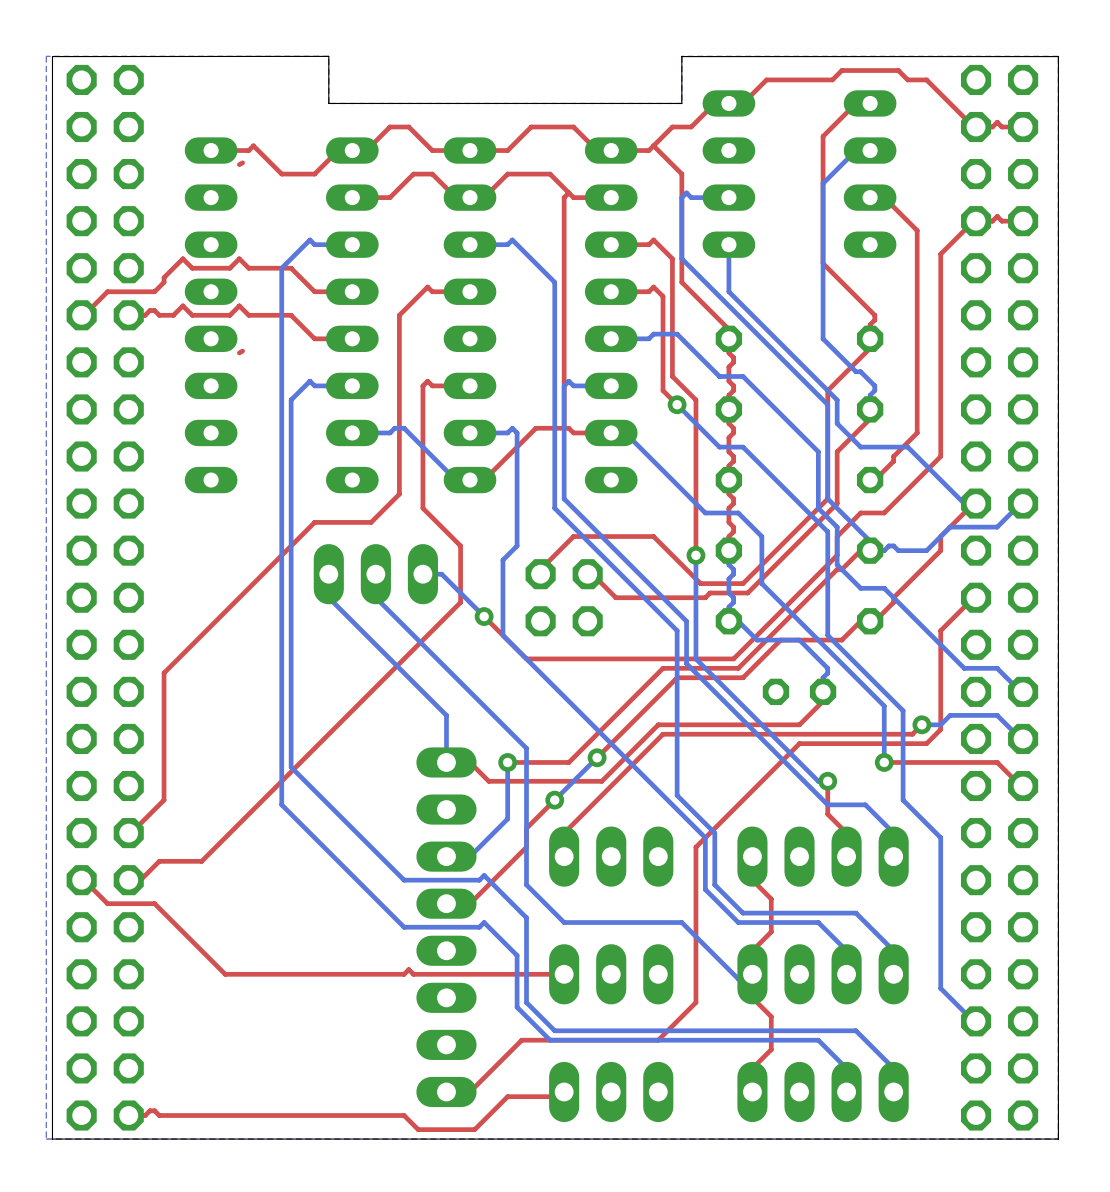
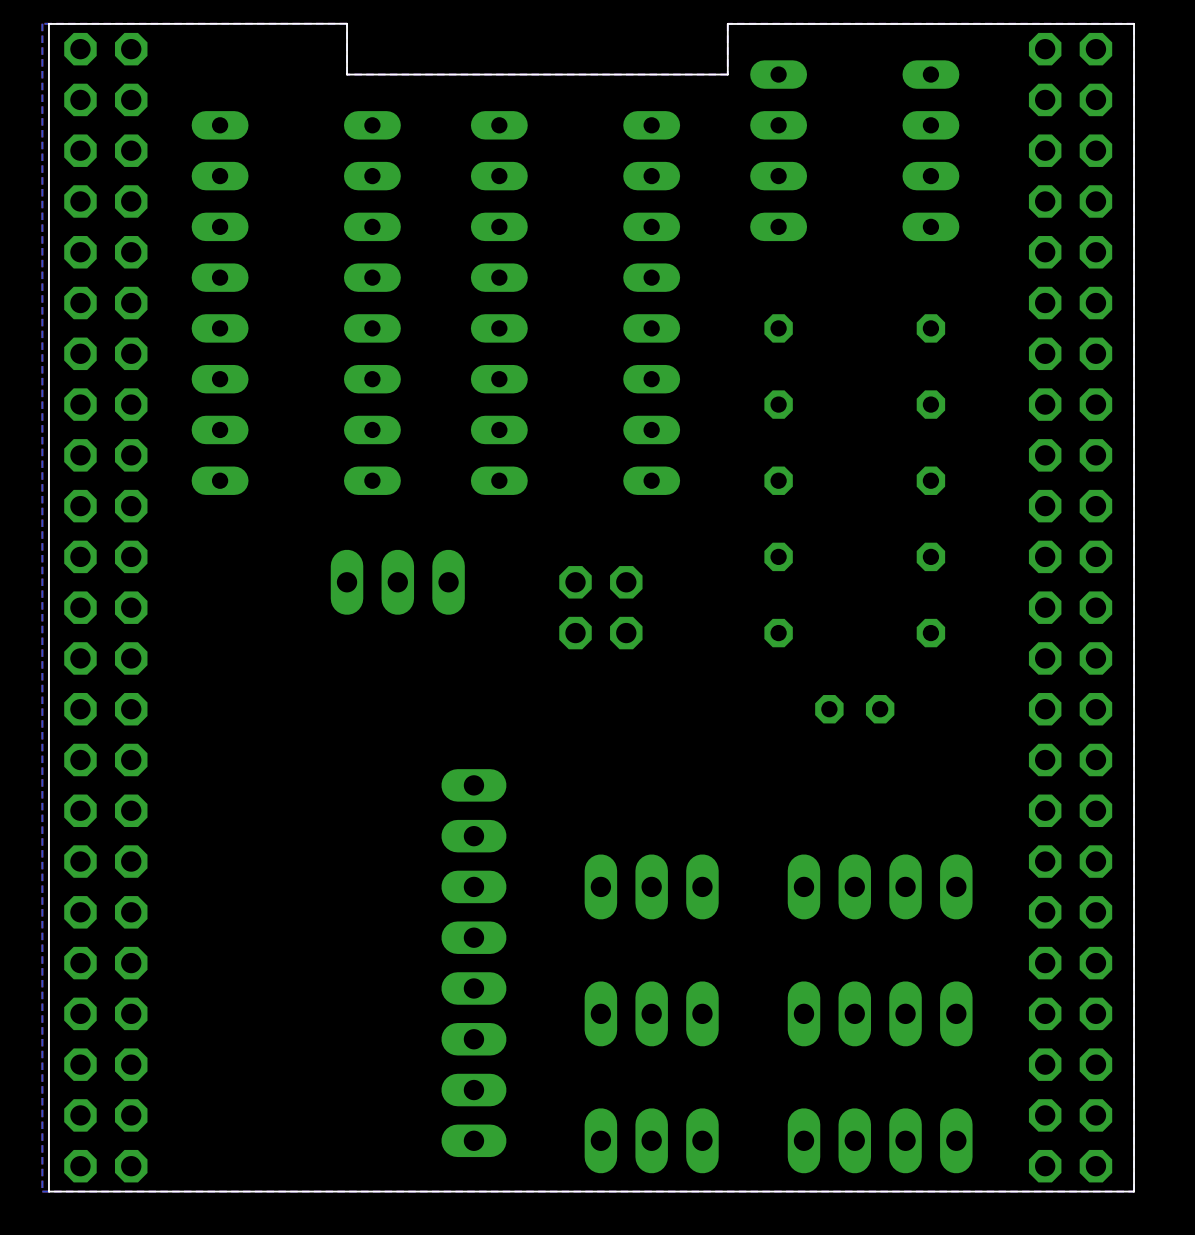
top track: (870, 103) (856, 103) (823, 136) (823, 263) (874, 315) (874, 320) (870, 324) (870, 348) (827, 390) (827, 498) (743, 583) (700, 583) (653, 536) (573, 536) (540, 569) (540, 574) -> none
top track: (1023, 127) (1001, 127) (997, 122) (992, 127) (973, 127) (926, 79) (907, 79) (898, 70) (841, 70) (832, 79) (766, 79) (743, 103) (714, 103) (691, 127) (672, 127) (648, 150) (597, 150) (573, 127) (531, 127) (507, 150) (432, 150) (408, 127) (389, 127) (366, 150) (338, 150) (314, 174) (281, 174) (253, 145) (248, 150) (211, 150) -> none
top track: (653, 145) (681, 174) (681, 282) (728, 329) (728, 352) (733, 357) (733, 362) (728, 367) (728, 381) (733, 385) (733, 390) (728, 395) (728, 423) (733, 428) (733, 432) (728, 437) (728, 451) (733, 456) (733, 461) (728, 465) (728, 494) (733, 498) (733, 503) (728, 508) (728, 522) (733, 527) (733, 531) (728, 536) (728, 550) -> none
bottom track: (870, 150) (856, 150) (823, 183) (823, 338) (856, 371) (860, 371) (874, 385) (874, 390) (870, 395) (870, 409) -> none
top track: (242, 162) (239, 164) -> none
top track: (568, 192) (564, 197) (564, 428) -> none
top track: (611, 197) (573, 197) (550, 174) (507, 174) (484, 197) (455, 197) (432, 174) (413, 174) (389, 197) (352, 197) -> none
bottom track: (728, 197) (691, 197) (686, 192) (681, 197) (681, 258) (827, 404) (827, 498) (879, 550) -> none
top track: (870, 197) (884, 197) (917, 230) (917, 432) (893, 456) (893, 461) (874, 480) (870, 480) -> none
top track: (1023, 221) (1001, 221) (997, 216) (992, 221) (973, 221) (940, 254) (940, 456) (884, 512) (860, 512) (837, 536) (837, 555) (733, 658) (526, 658) (484, 616) -> none
bottom track: (352, 244) (314, 244) (309, 239) (281, 268) (281, 804) (404, 927) (479, 927) (484, 922) (517, 955) (517, 1007) (550, 1040) (818, 1040) (846, 1068) (846, 1091) -> none
bottom track: (470, 244) (507, 244) (512, 239) (554, 282) (554, 508) (677, 630) (677, 795) (714, 833) (714, 884) (743, 913) (856, 913) (893, 950) (893, 974) -> none
top track: (611, 244) (648, 244) (653, 239) (672, 258) (672, 376) (695, 400) (695, 555) -> none
bottom track: (728, 244) (728, 291) (837, 400) (837, 423) (860, 447) (907, 447) (964, 503) (976, 503) -> none
top track: (352, 291) (314, 291) (291, 268) (248, 268) (239, 258) (229, 268) (192, 268) (182, 258) (164, 277) (164, 282) (154, 291) (107, 291) (84, 315) (81, 315) -> none
top track: (470, 291) (432, 291) (427, 287) (399, 315) (399, 494) (371, 522) (314, 522) (164, 673) (164, 800) (131, 833) (128, 833) -> none
top track: (611, 291) (648, 291) (653, 287) (663, 296) (663, 390) (677, 404) -> none
top track: (128, 315) (145, 315) (149, 310) (154, 310) (159, 315) (173, 315) (182, 305) (192, 315) (229, 315) (239, 305) (248, 315) (291, 315) (314, 338) (352, 338) -> none
bottom track: (611, 338) (648, 338) (653, 334) (677, 334) (719, 376) (743, 376) (818, 451) (818, 508) (837, 527) (837, 564) (860, 588) (884, 588) (964, 668) (997, 668) (1020, 691) (1023, 691) -> none
top track: (242, 351) (239, 352) -> none
bottom track: (352, 385) (314, 385) (309, 381) (291, 400) (291, 767) (404, 880) (479, 880) (484, 875) (526, 917) (526, 1002) (554, 1030) (856, 1030) (893, 1068) (893, 1091) -> none
top track: (470, 385) (432, 385) (427, 381) (422, 385) (422, 508) (460, 545) (460, 602) (201, 861) (159, 861) (140, 880) (128, 880) -> none
bottom track: (611, 385) (573, 385) (568, 381) (564, 385) (564, 498) (686, 621) (686, 663) (827, 804) (865, 804) (893, 833) (893, 856) -> none
bottom track: (677, 404) (719, 447) (743, 447) (827, 531) (827, 635) (903, 710) (903, 800) (940, 837) (940, 988) (973, 1021) (976, 1021) -> none
via: (677, 404) -> none
top track: (870, 409) (870, 418) (837, 451) (837, 503) (747, 593) (710, 593) (705, 597) (615, 597) (592, 574) (587, 574) -> none
bottom track: (352, 432) (389, 432) (394, 428) (404, 428) (455, 480) (470, 480) -> none
bottom track: (470, 432) (507, 432) (512, 428) (517, 432) (517, 545) (502, 560) (502, 635) (705, 837) (705, 889) (738, 922) (818, 922) (846, 950) (846, 974) -> none
top track: (611, 432) (573, 432) (568, 428) (535, 428) (484, 480) (470, 480) -> none
bottom track: (611, 432) (625, 432) (705, 512) (738, 512) (761, 536) (761, 583) (884, 705) (884, 762) -> none
top track: (976, 503) (973, 503) (940, 536) (940, 550) (893, 597) (893, 602) (874, 621) (860, 621) (841, 640) (780, 640) (743, 677) (677, 677) (597, 757) -> none
bottom track: (1023, 503) (1020, 503) (997, 527) (950, 527) (926, 550) (898, 550) (893, 545) (888, 545) (884, 550) (870, 550) -> none
bottom track: (728, 550) (728, 564) (733, 569) (733, 574) (728, 578) (728, 593) (733, 597) (733, 602) (728, 607) (728, 621) (738, 621) (757, 640) (799, 640) (827, 668) (827, 673) (823, 677) (823, 691) -> none
top track: (870, 550) (860, 550) (841, 569) (837, 569) (738, 668) (663, 668) (568, 762) (507, 762) -> none
bottom track: (695, 555) (695, 658) (818, 781) (827, 781) -> none
via: (695, 555) -> none
bottom track: (328, 574) (328, 597) (446, 715) (446, 762) -> none
bottom track: (375, 574) (375, 597) (526, 748) (526, 884) (564, 922) (681, 922) (738, 979) (747, 979) (752, 974) -> none
bottom track: (422, 574) (441, 574) (484, 616) -> none
top track: (976, 597) (973, 597) (940, 630) (940, 729) (926, 743) (799, 743) (695, 847) (695, 1002) (658, 1040) (521, 1040) (470, 1091) (446, 1091) -> none
via: (484, 616) -> none
top track: (823, 691) (823, 701) (799, 724) (658, 724) (601, 781) (488, 781) (470, 762) (446, 762) -> none
top track: (921, 724) (912, 734) (663, 734) (564, 833) (564, 856) -> none
bottom track: (921, 724) (940, 724) (950, 715) (997, 715) (1020, 738) (1023, 738) -> none
via: (921, 724) -> none
bottom track: (597, 757) (554, 800) -> none
via: (597, 757) -> none
bottom track: (507, 762) (507, 818) (470, 856) (446, 856) -> none
via: (507, 762) -> none
top track: (884, 762) (997, 762) (1020, 786) (1023, 786) -> none
via: (884, 762) -> none
top track: (827, 781) (827, 814) (846, 833) (846, 856) -> none
via: (827, 781) -> none
top track: (554, 800) (526, 828) (526, 847) (470, 903) (446, 903) -> none
via: (554, 800) -> none
top track: (752, 856) (752, 880) (771, 898) (771, 931) (752, 950) (752, 997) (771, 1016) (771, 1049) (752, 1068) (752, 1091) -> none
top track: (81, 880) (84, 880) (107, 903) (154, 903) (225, 974) (404, 974) (408, 969) (413, 974) (564, 974) -> none
top track: (564, 1091) (559, 1096) (507, 1096) (474, 1129) (418, 1129) (404, 1115) (159, 1115) (154, 1110) (149, 1110) (145, 1115) (128, 1115) -> none

